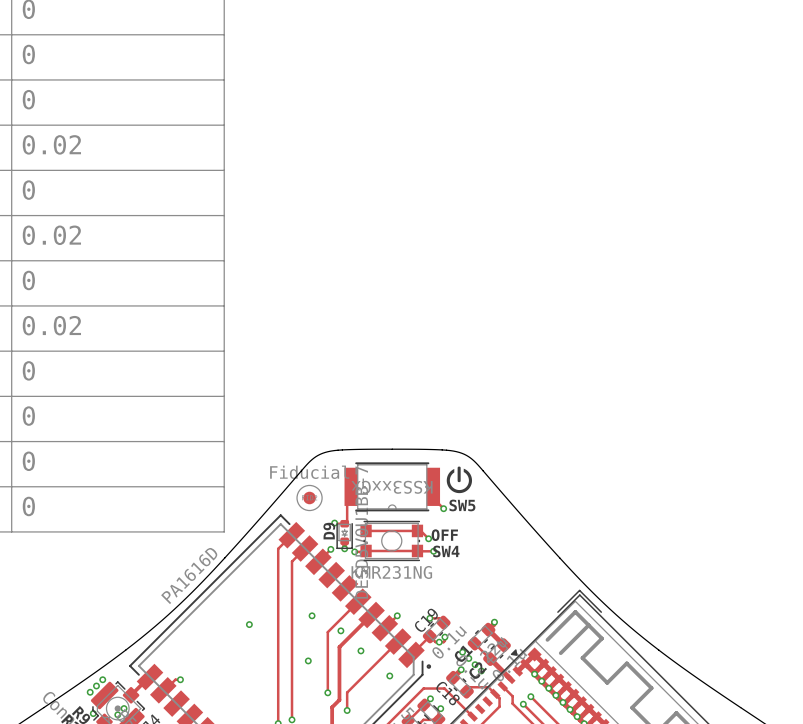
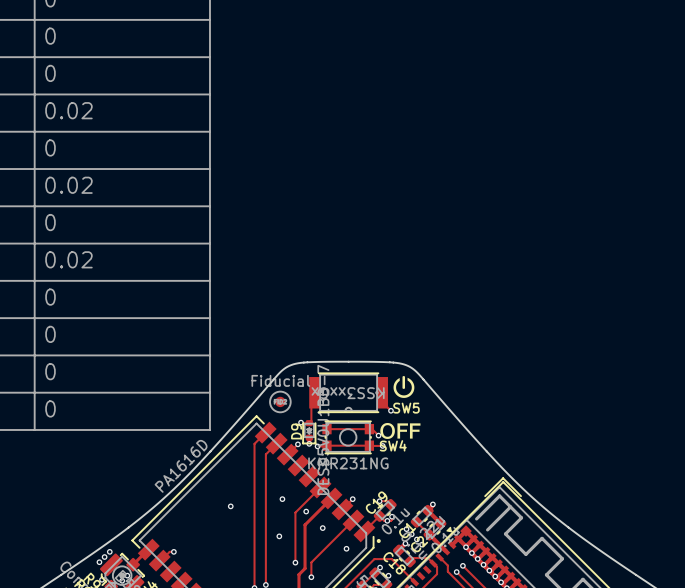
drawing: none -> [380, 422, 421, 439]
text: OFF (444, 535) -> none

